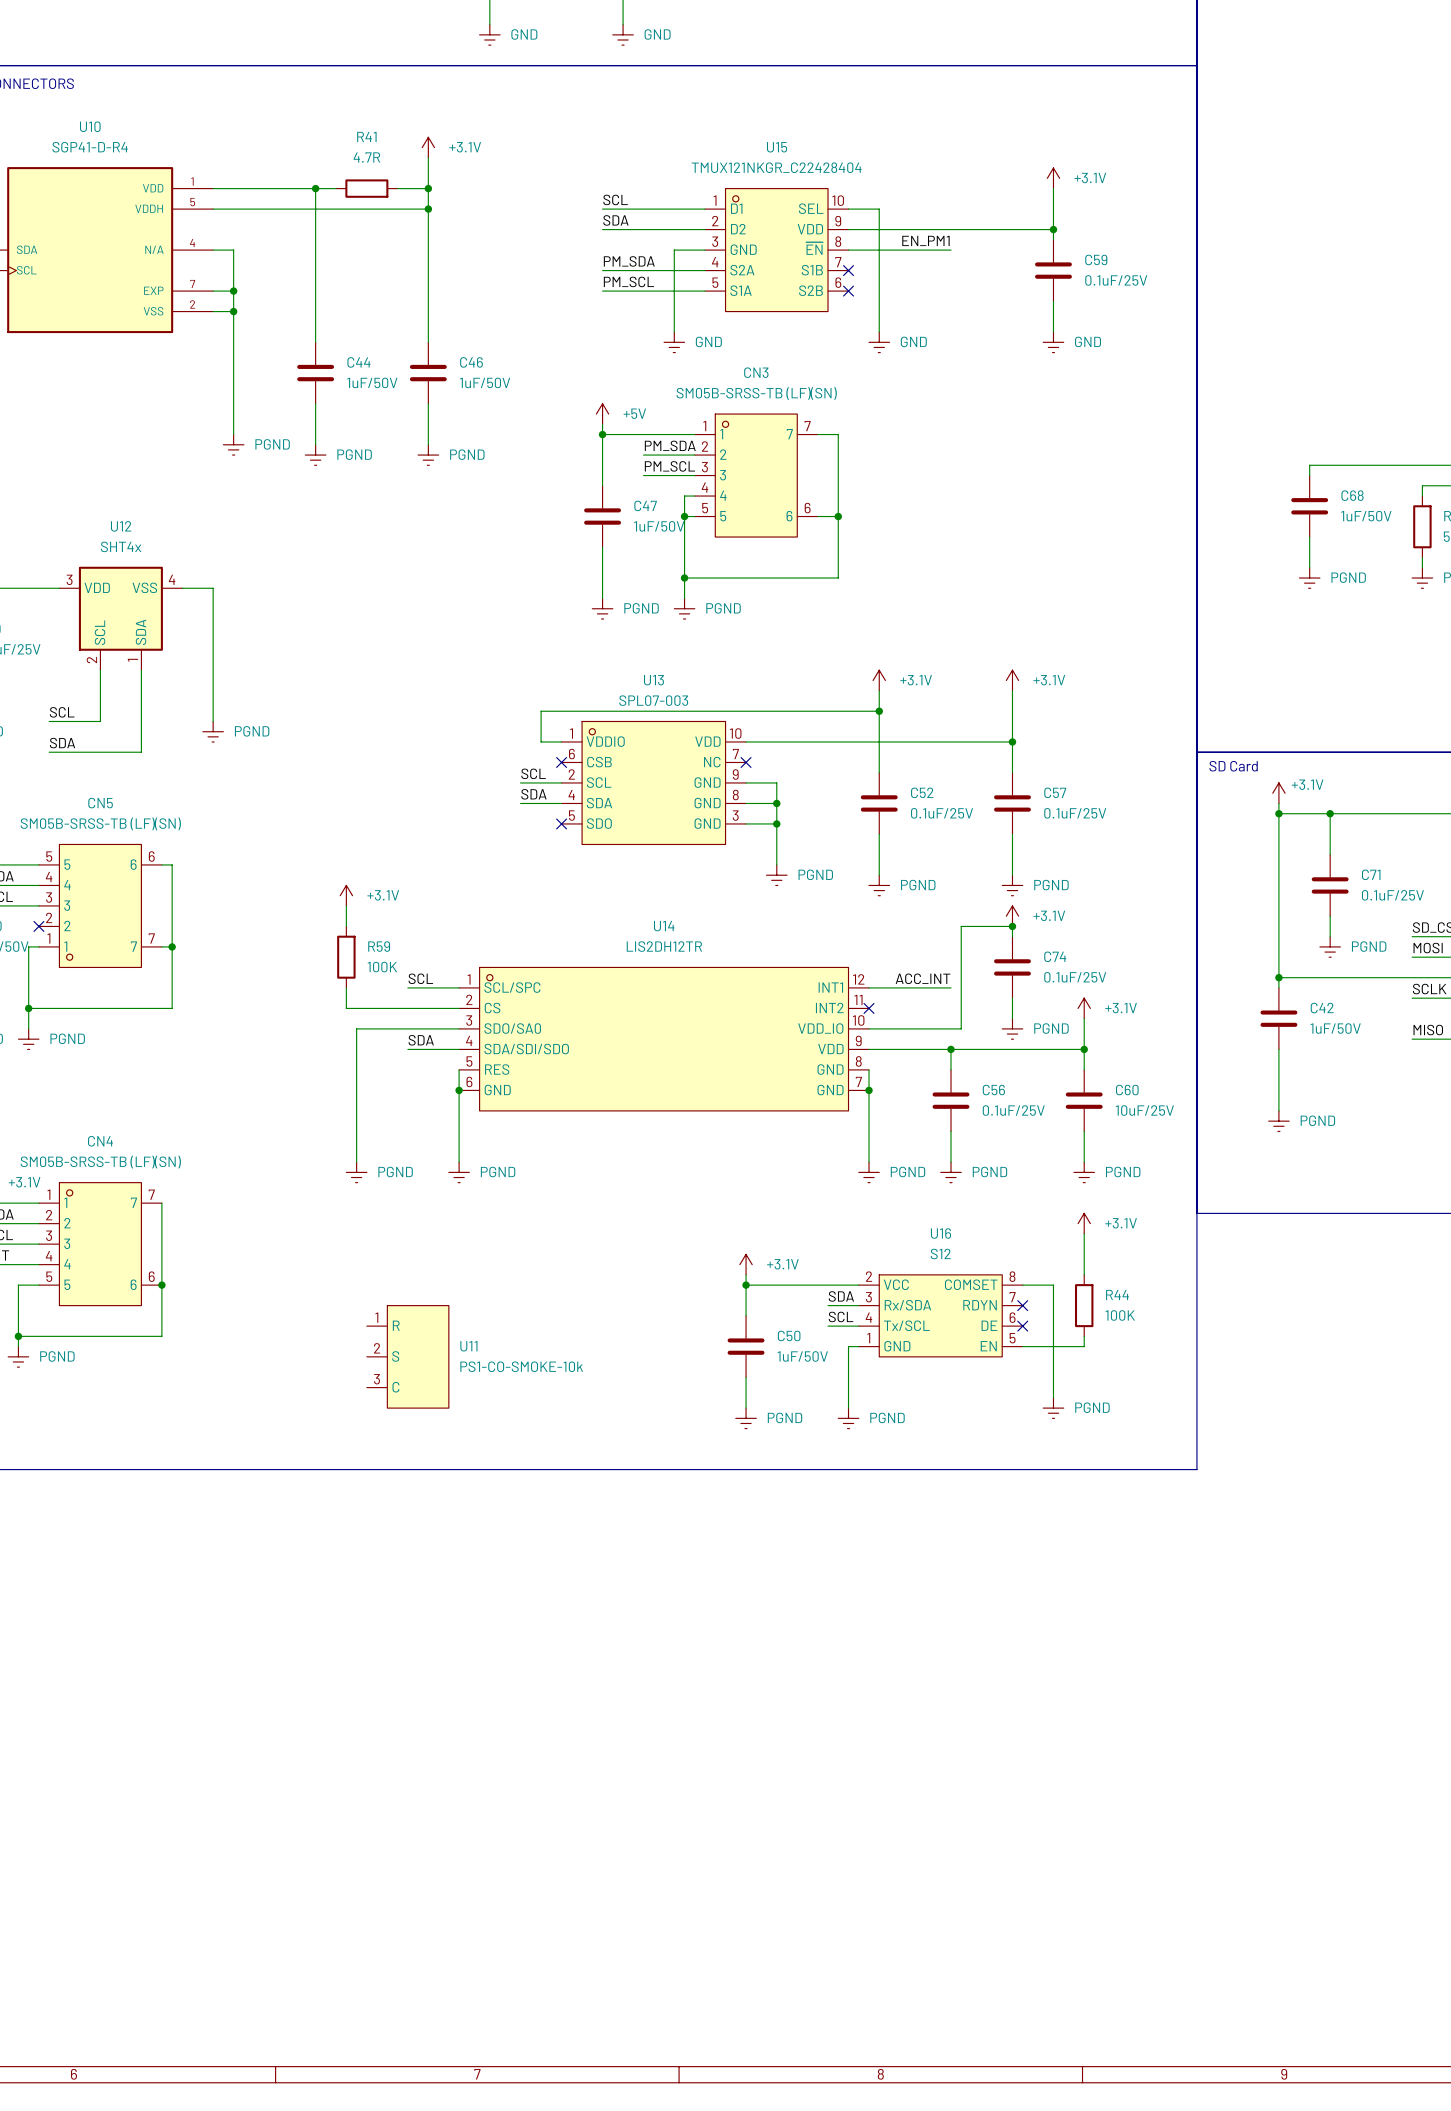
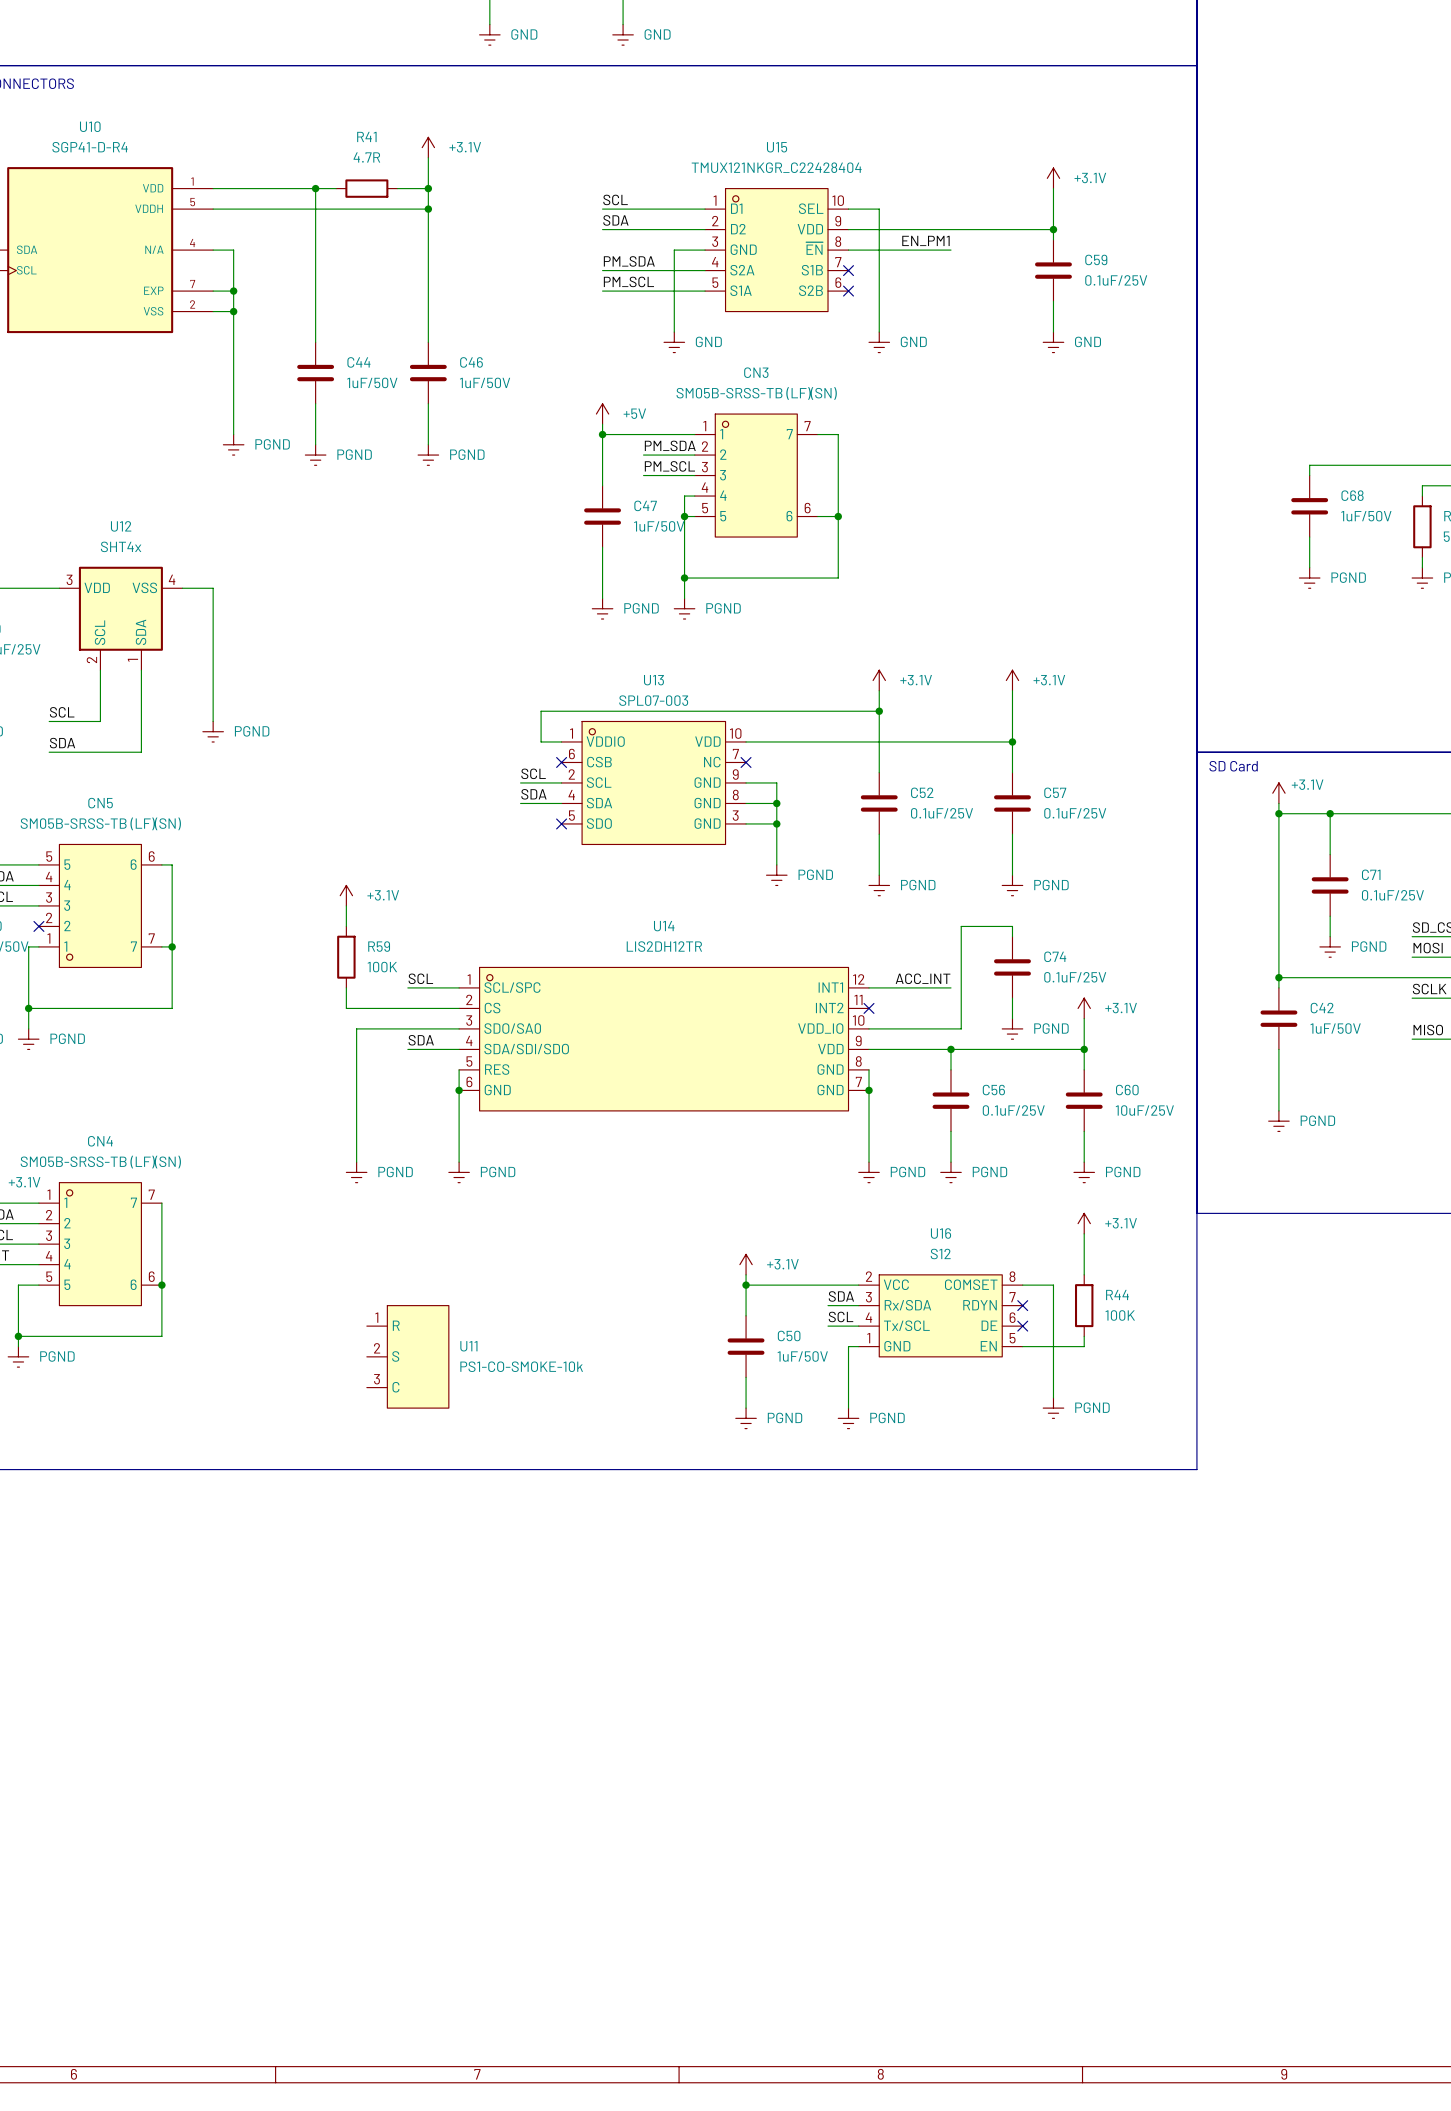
power symbol: +3.1V (1012, 916) -> none
junction: (1012, 926) -> none

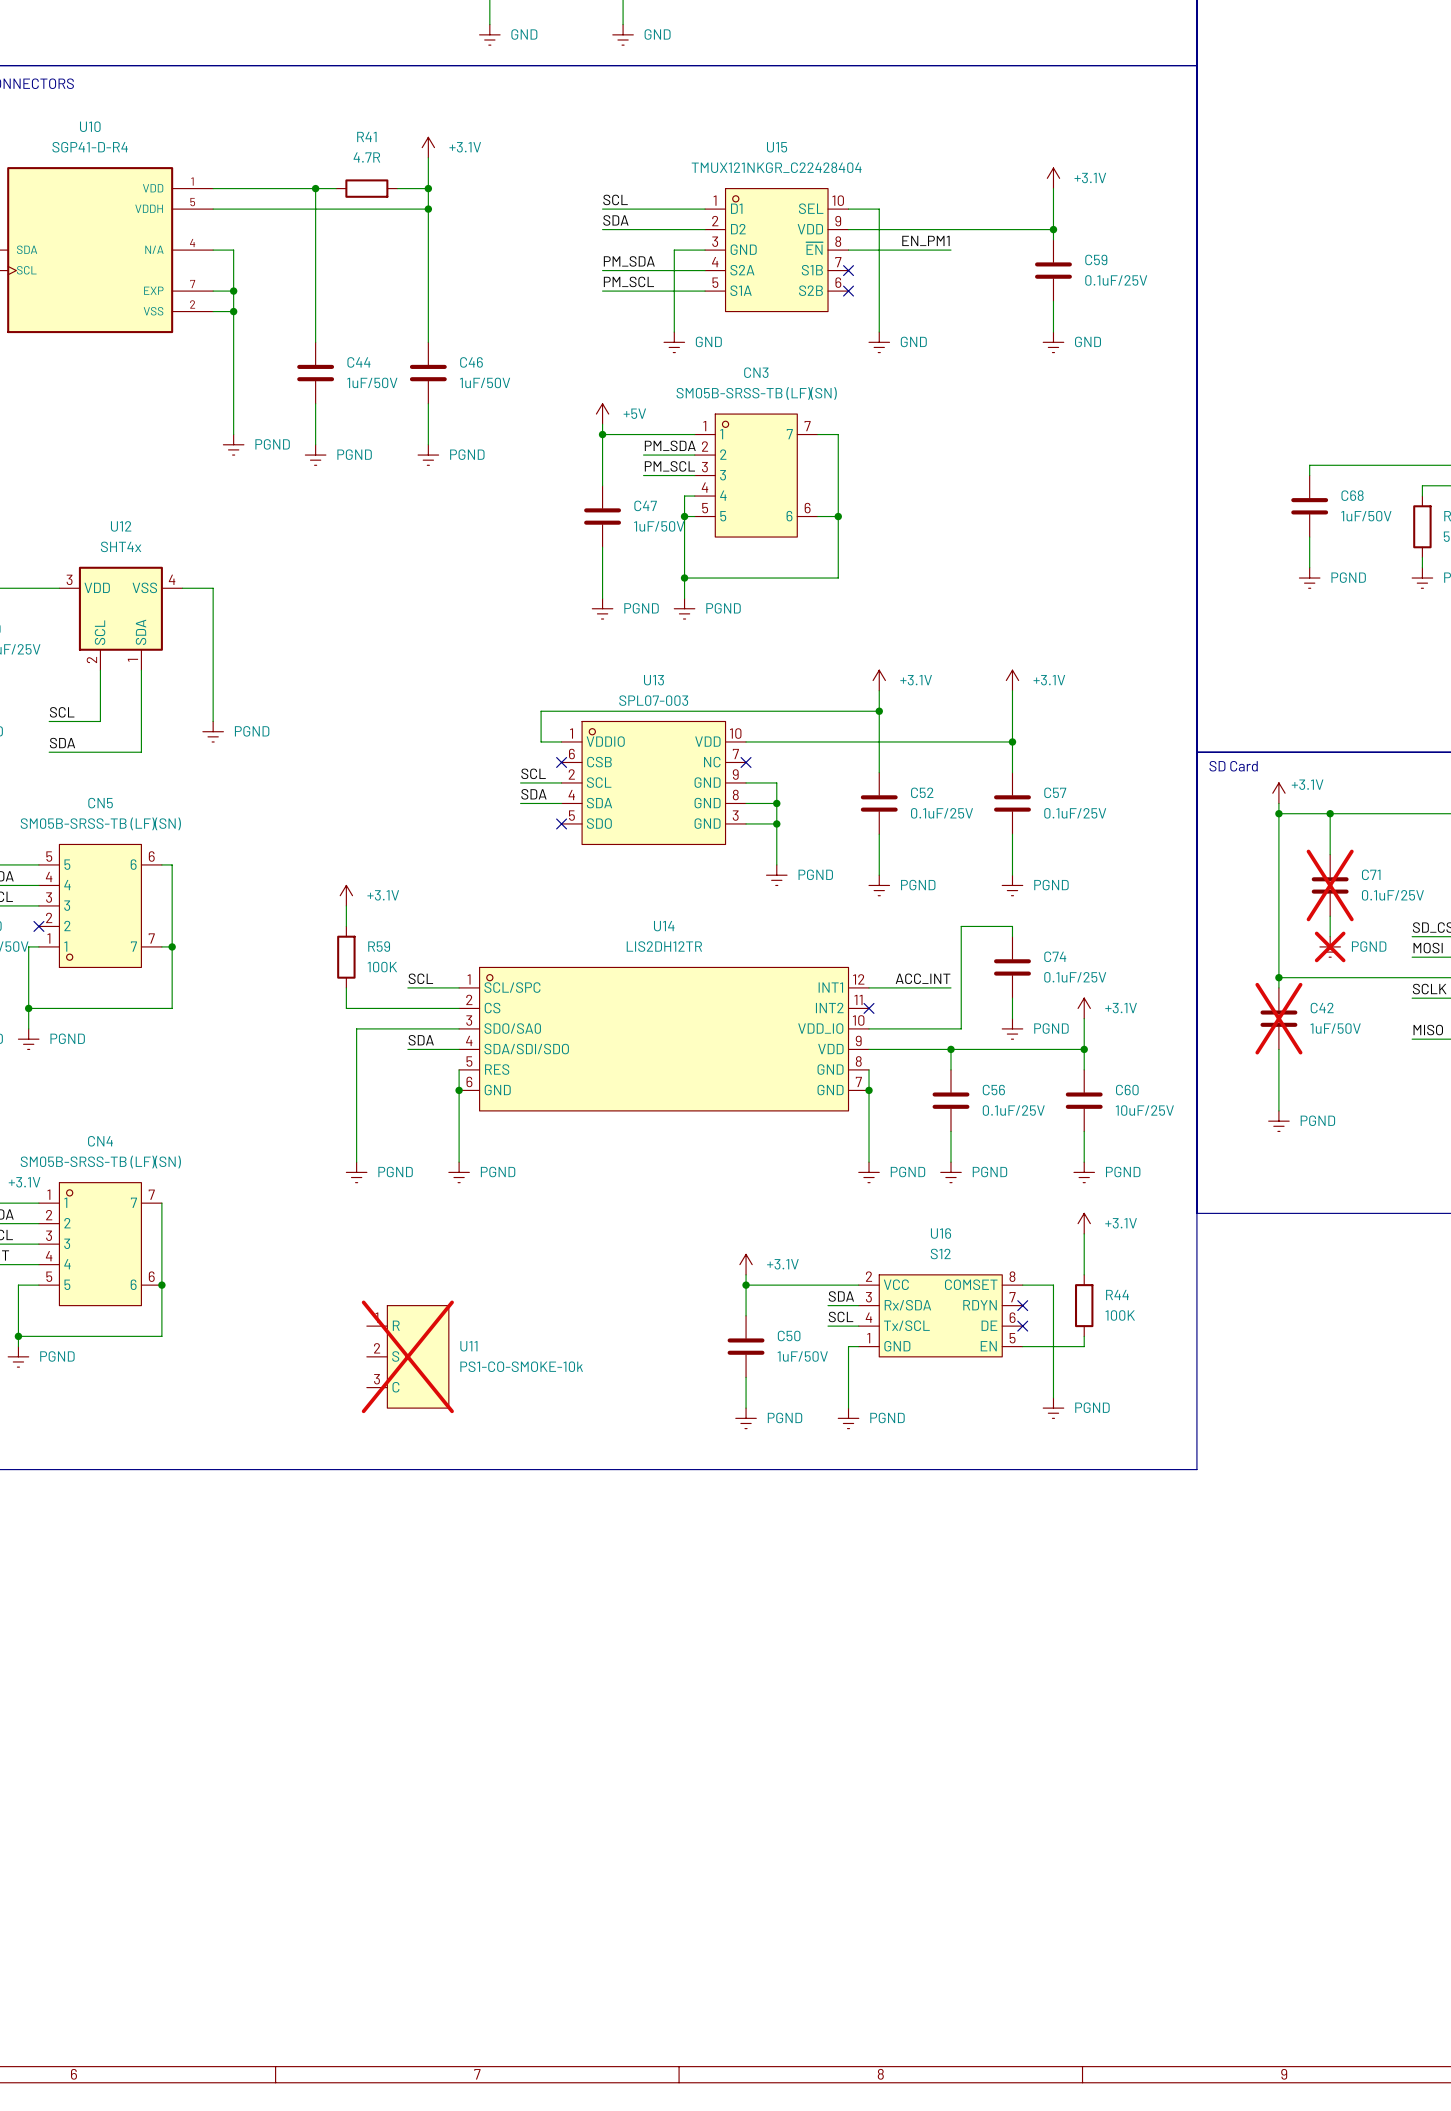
C71 do-not-place cross: none -> (1330, 885)
power symbol do-not-place cross: none -> (1330, 946)
C42 do-not-place cross: none -> (1278, 1018)
U11 do-not-place cross: none -> (407, 1356)

